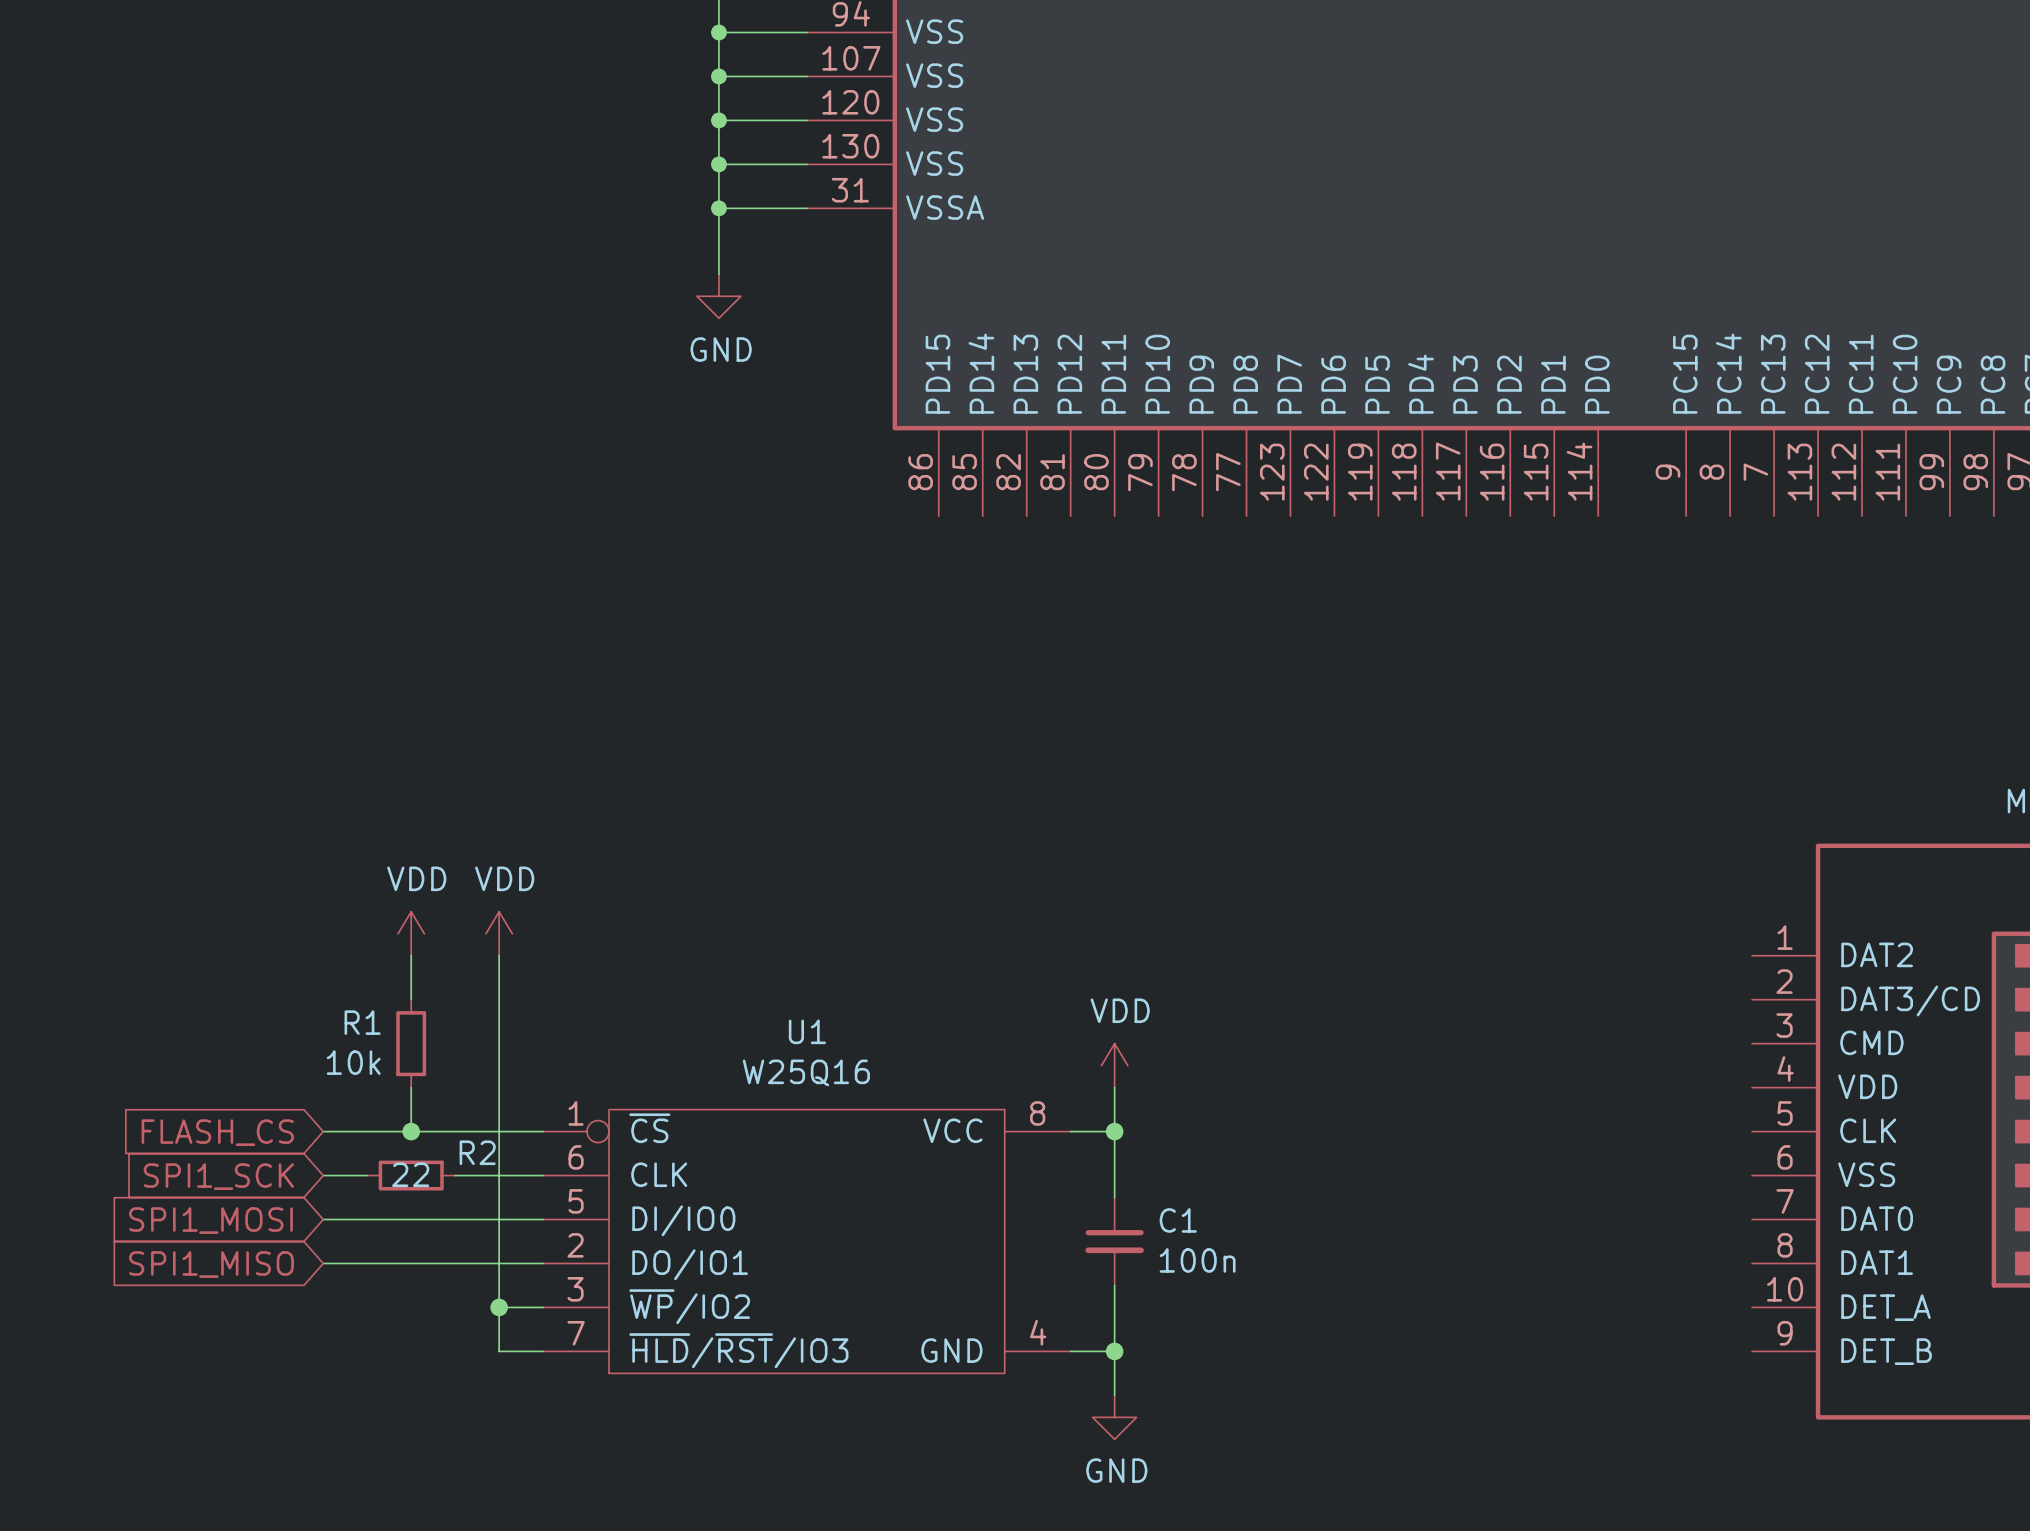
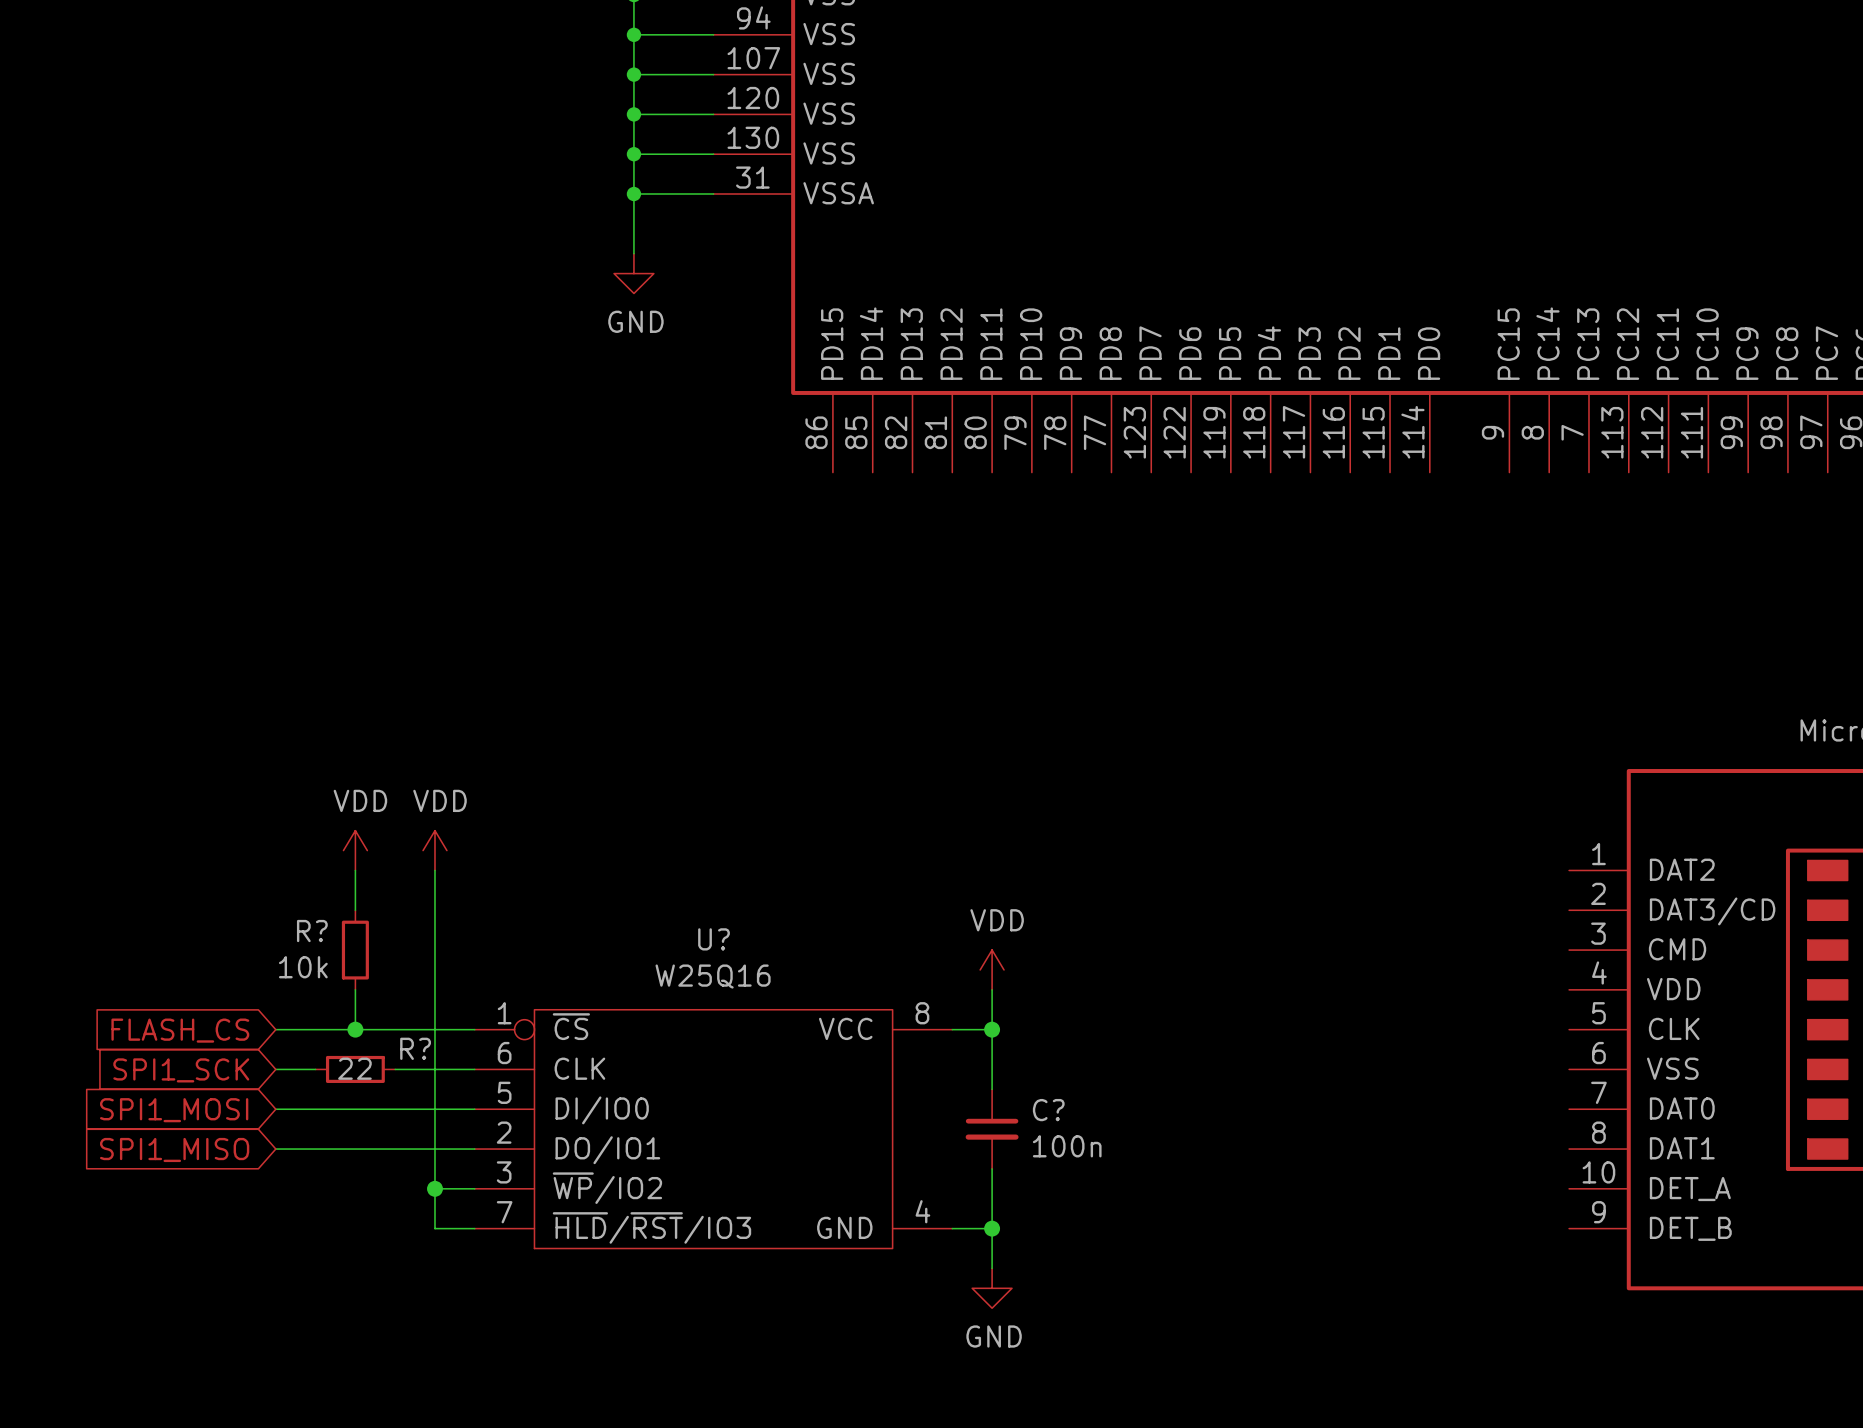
R1 name: R1 (362, 1022) -> R? (312, 931)
U1 name: U1 (807, 1031) -> U? (714, 939)
R2 name: R2 (477, 1152) -> R? (415, 1048)
C1 name: C1 (1178, 1220) -> C? (1048, 1110)

